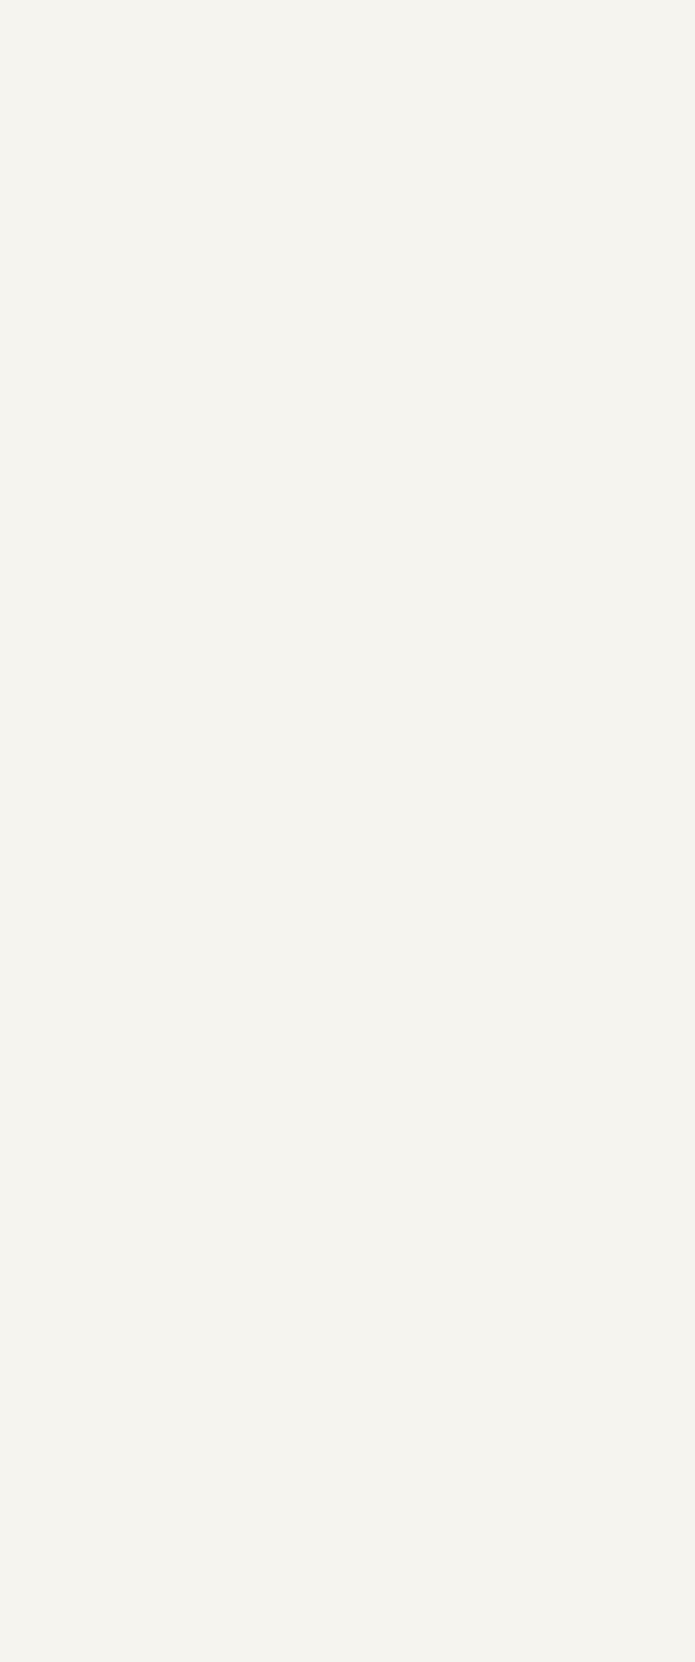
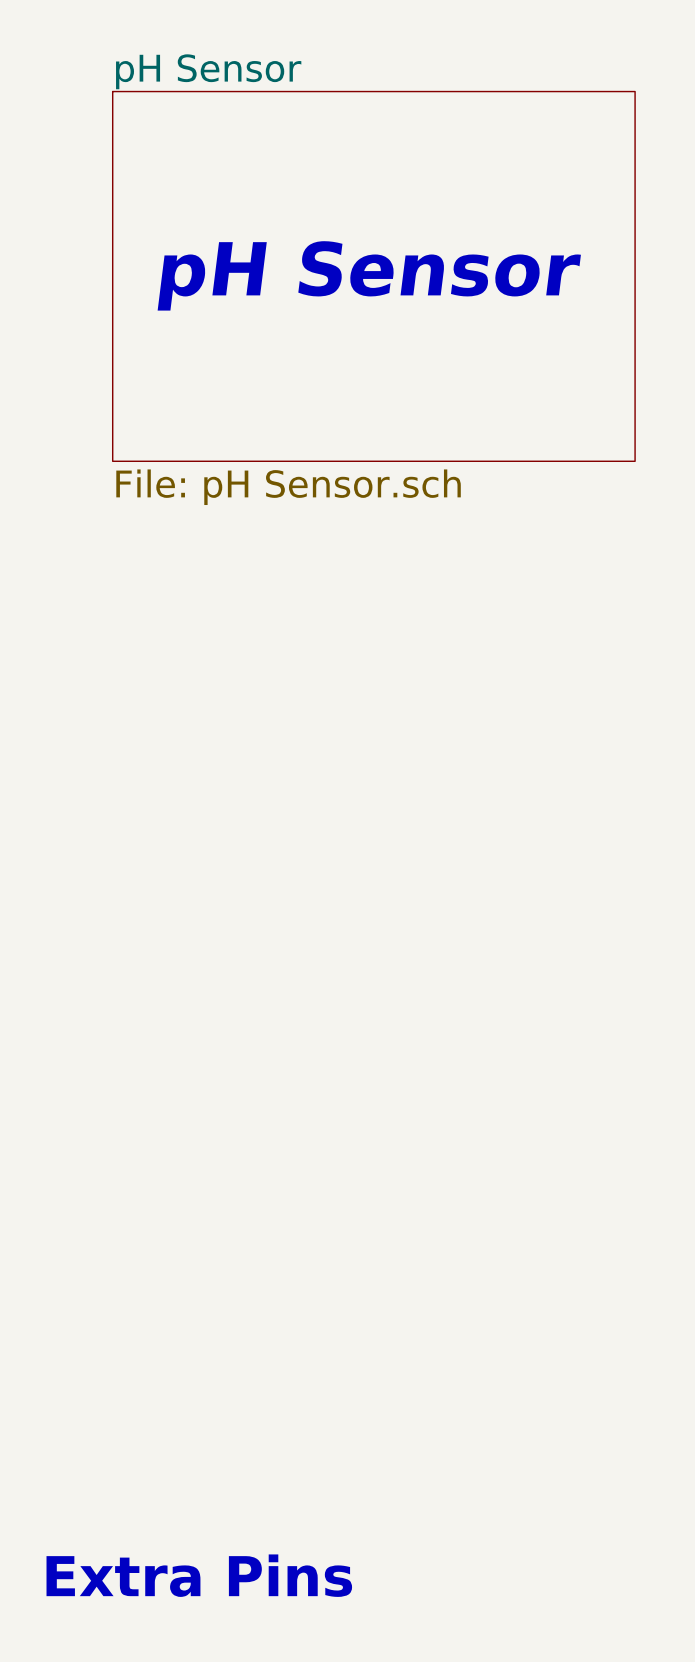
sheet pH Sensor: none -> File: pH Sensor.sch (373, 276)
text: none -> pH Sensor (369, 275)
text: none -> Extra Pins (199, 1575)

